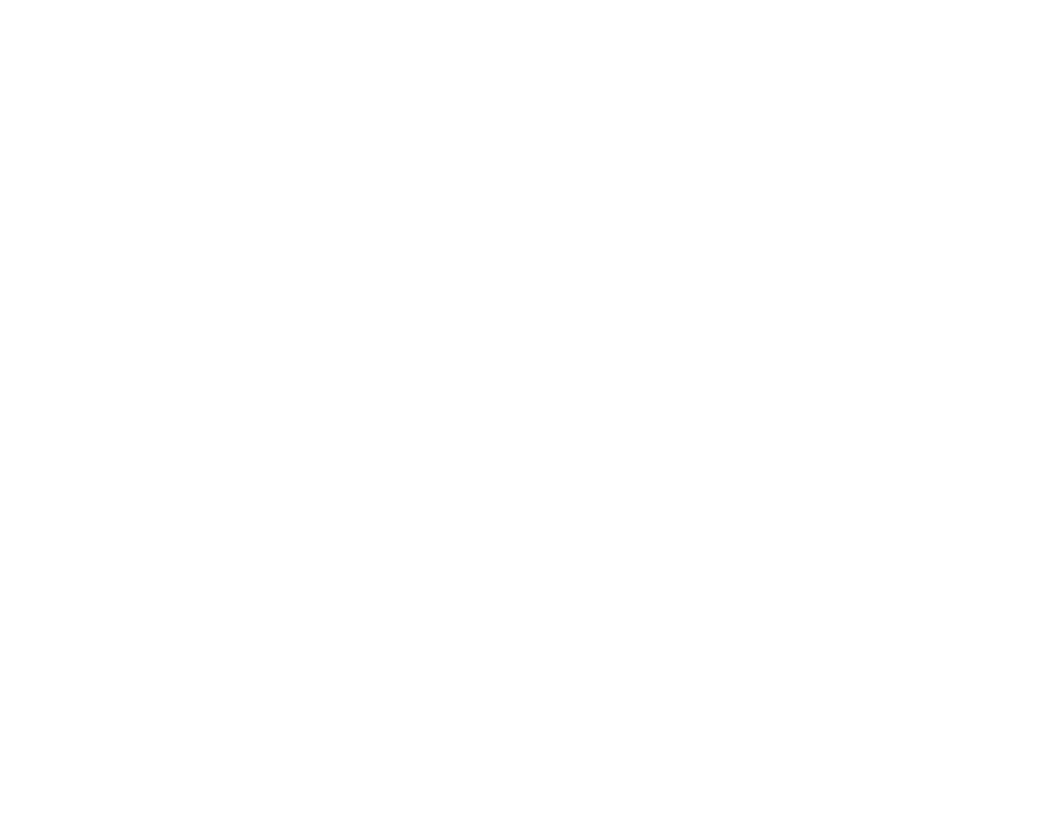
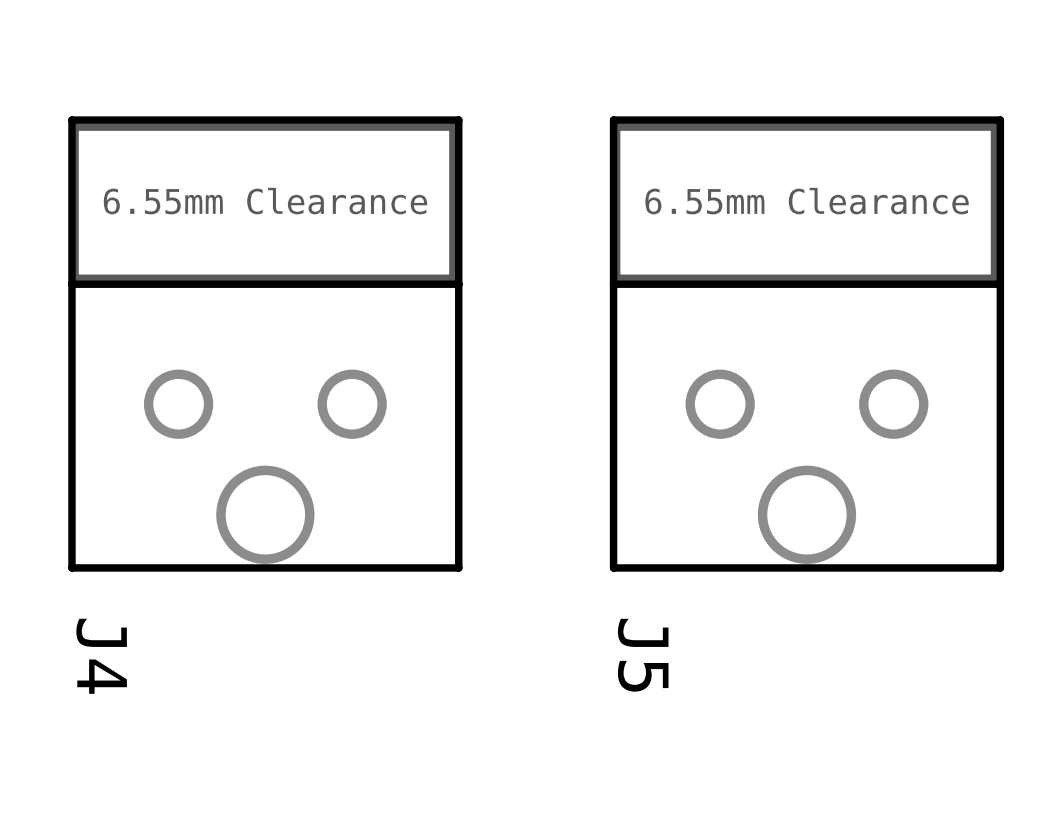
J4: none -> (265, 344)
J5: none -> (806, 344)

